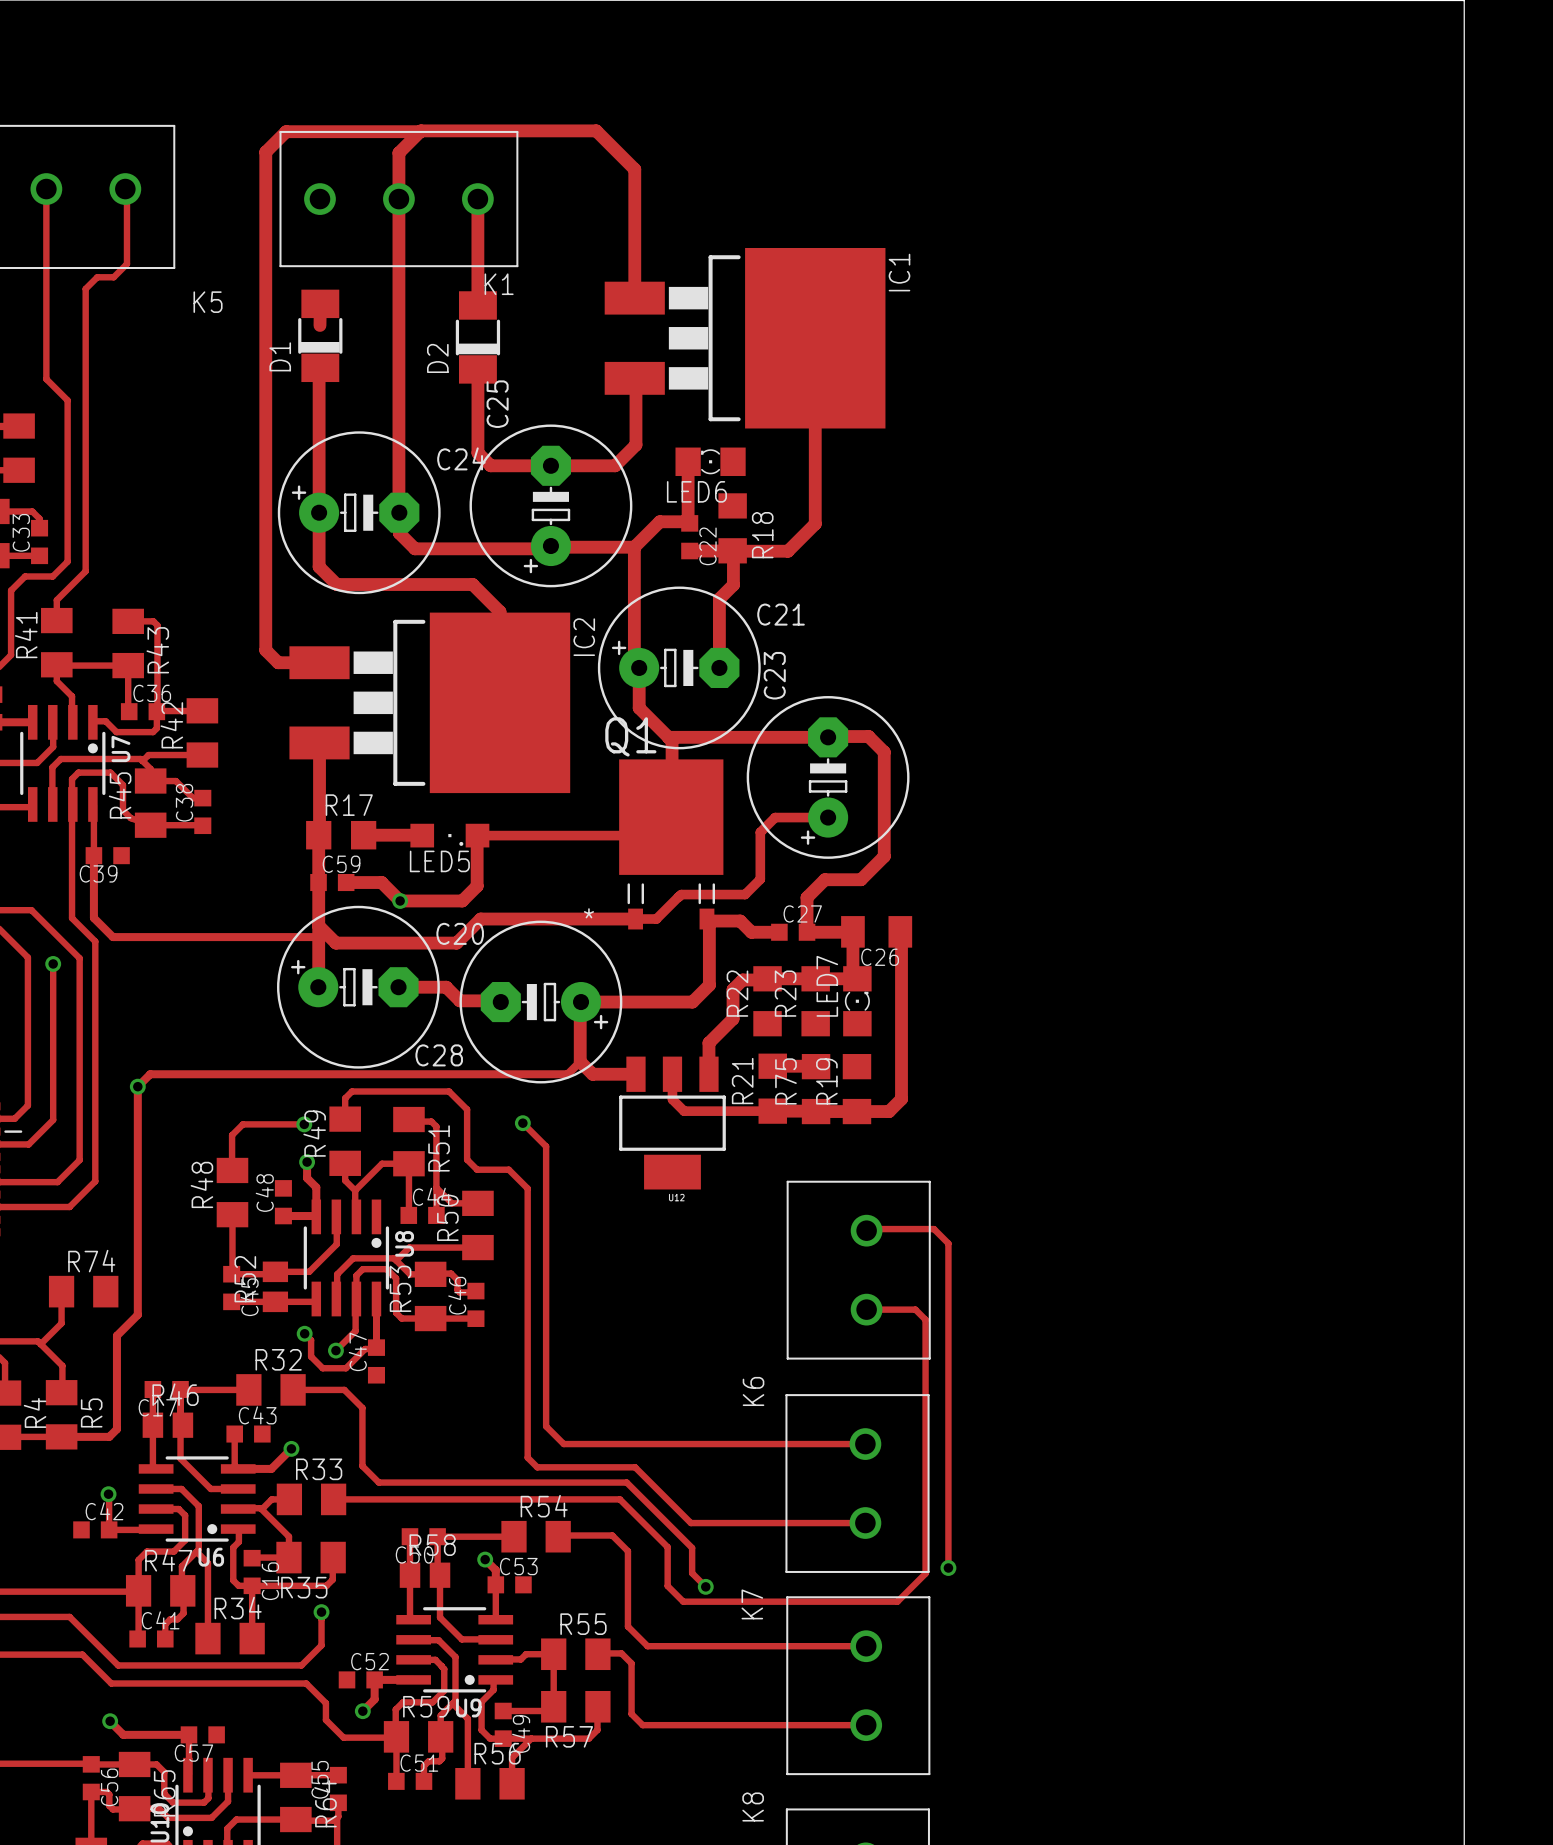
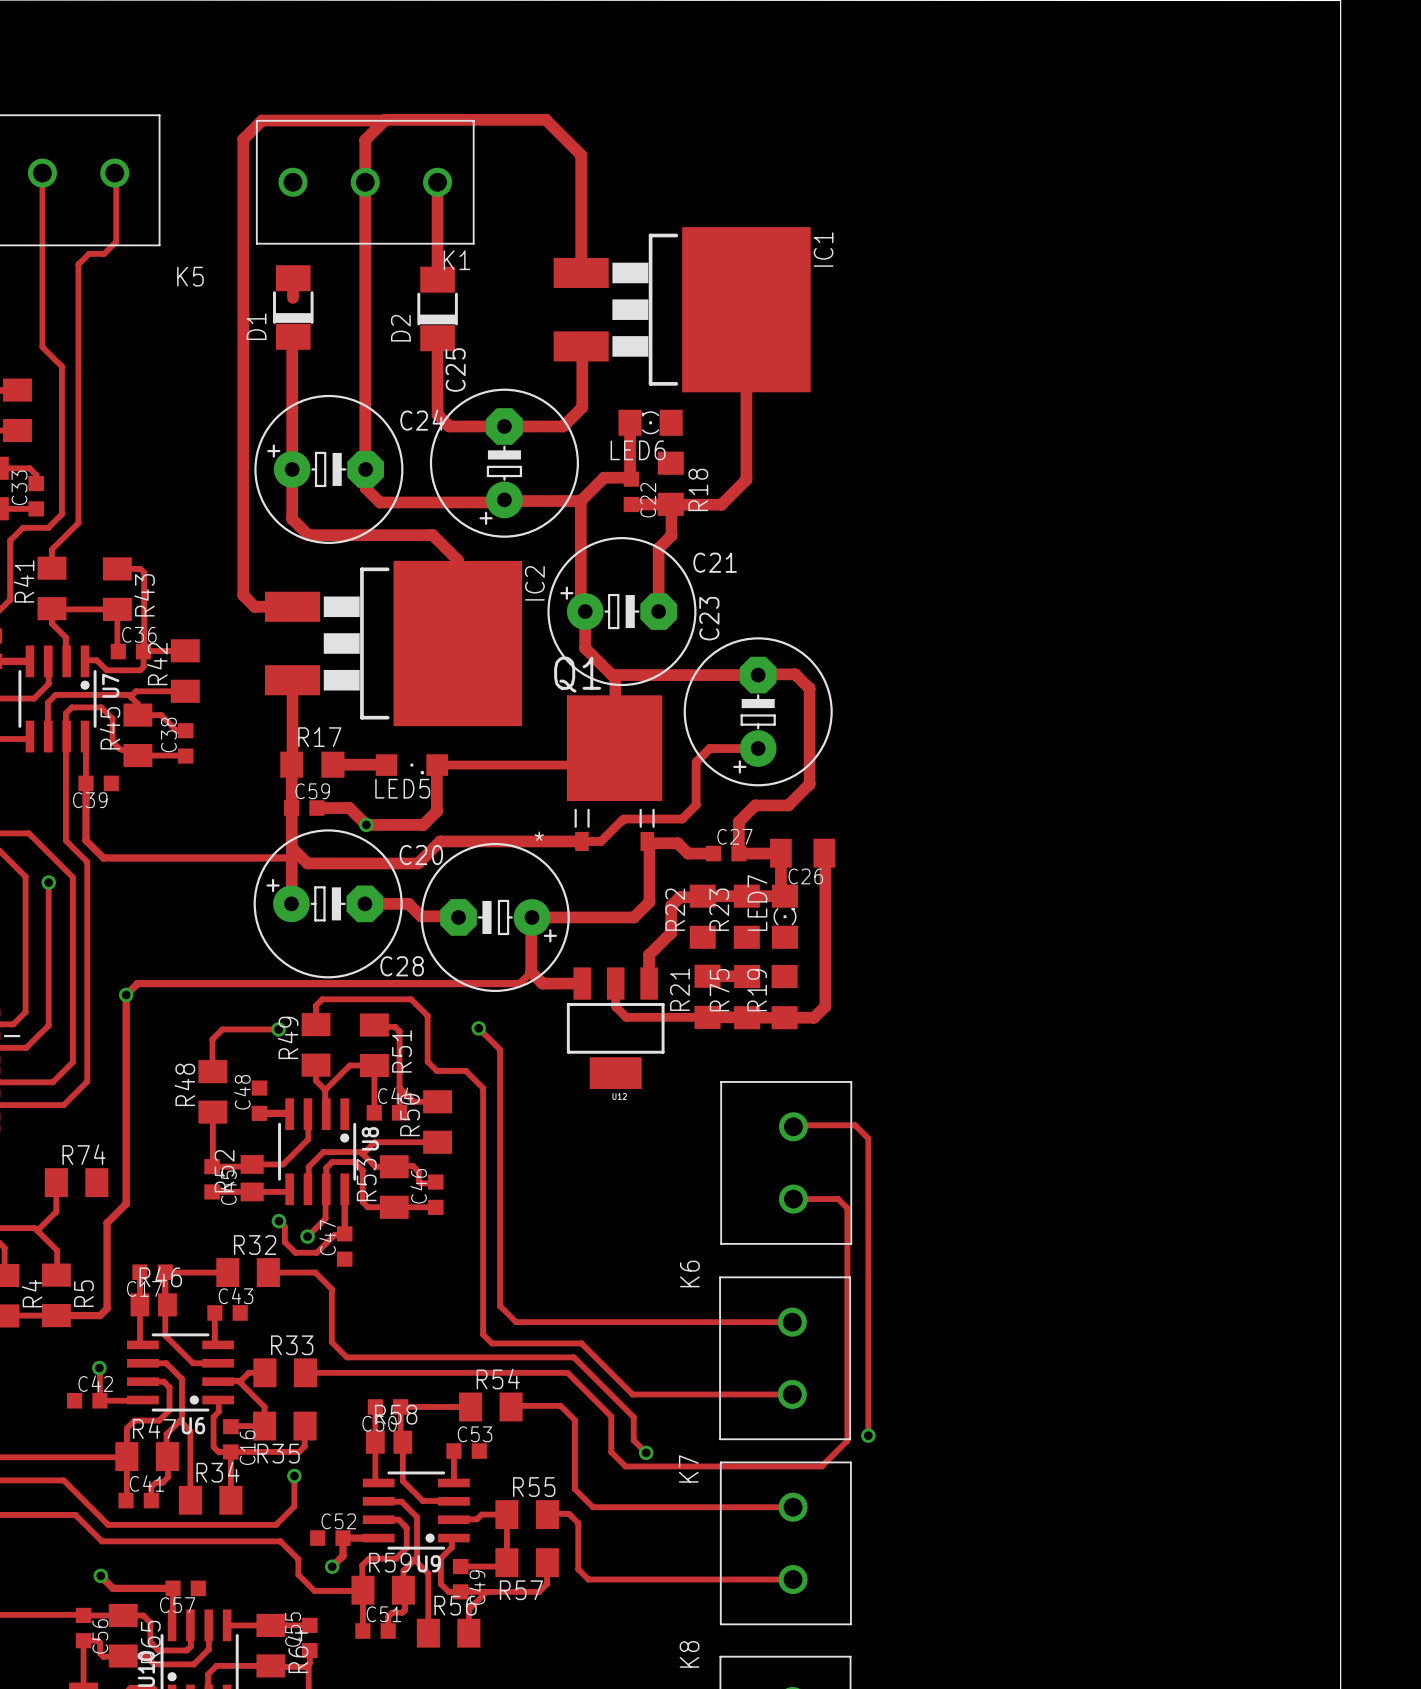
track: (307, 1162) (307, 1178) (316, 1187) (316, 1216) -> none
via: (307, 1162) -> none
track: (291, 1448) (271, 1468) (238, 1468) -> none
via: (291, 1448) -> none
track: (485, 1559) (495, 1570) (495, 1584) -> none
via: (485, 1559) -> none

